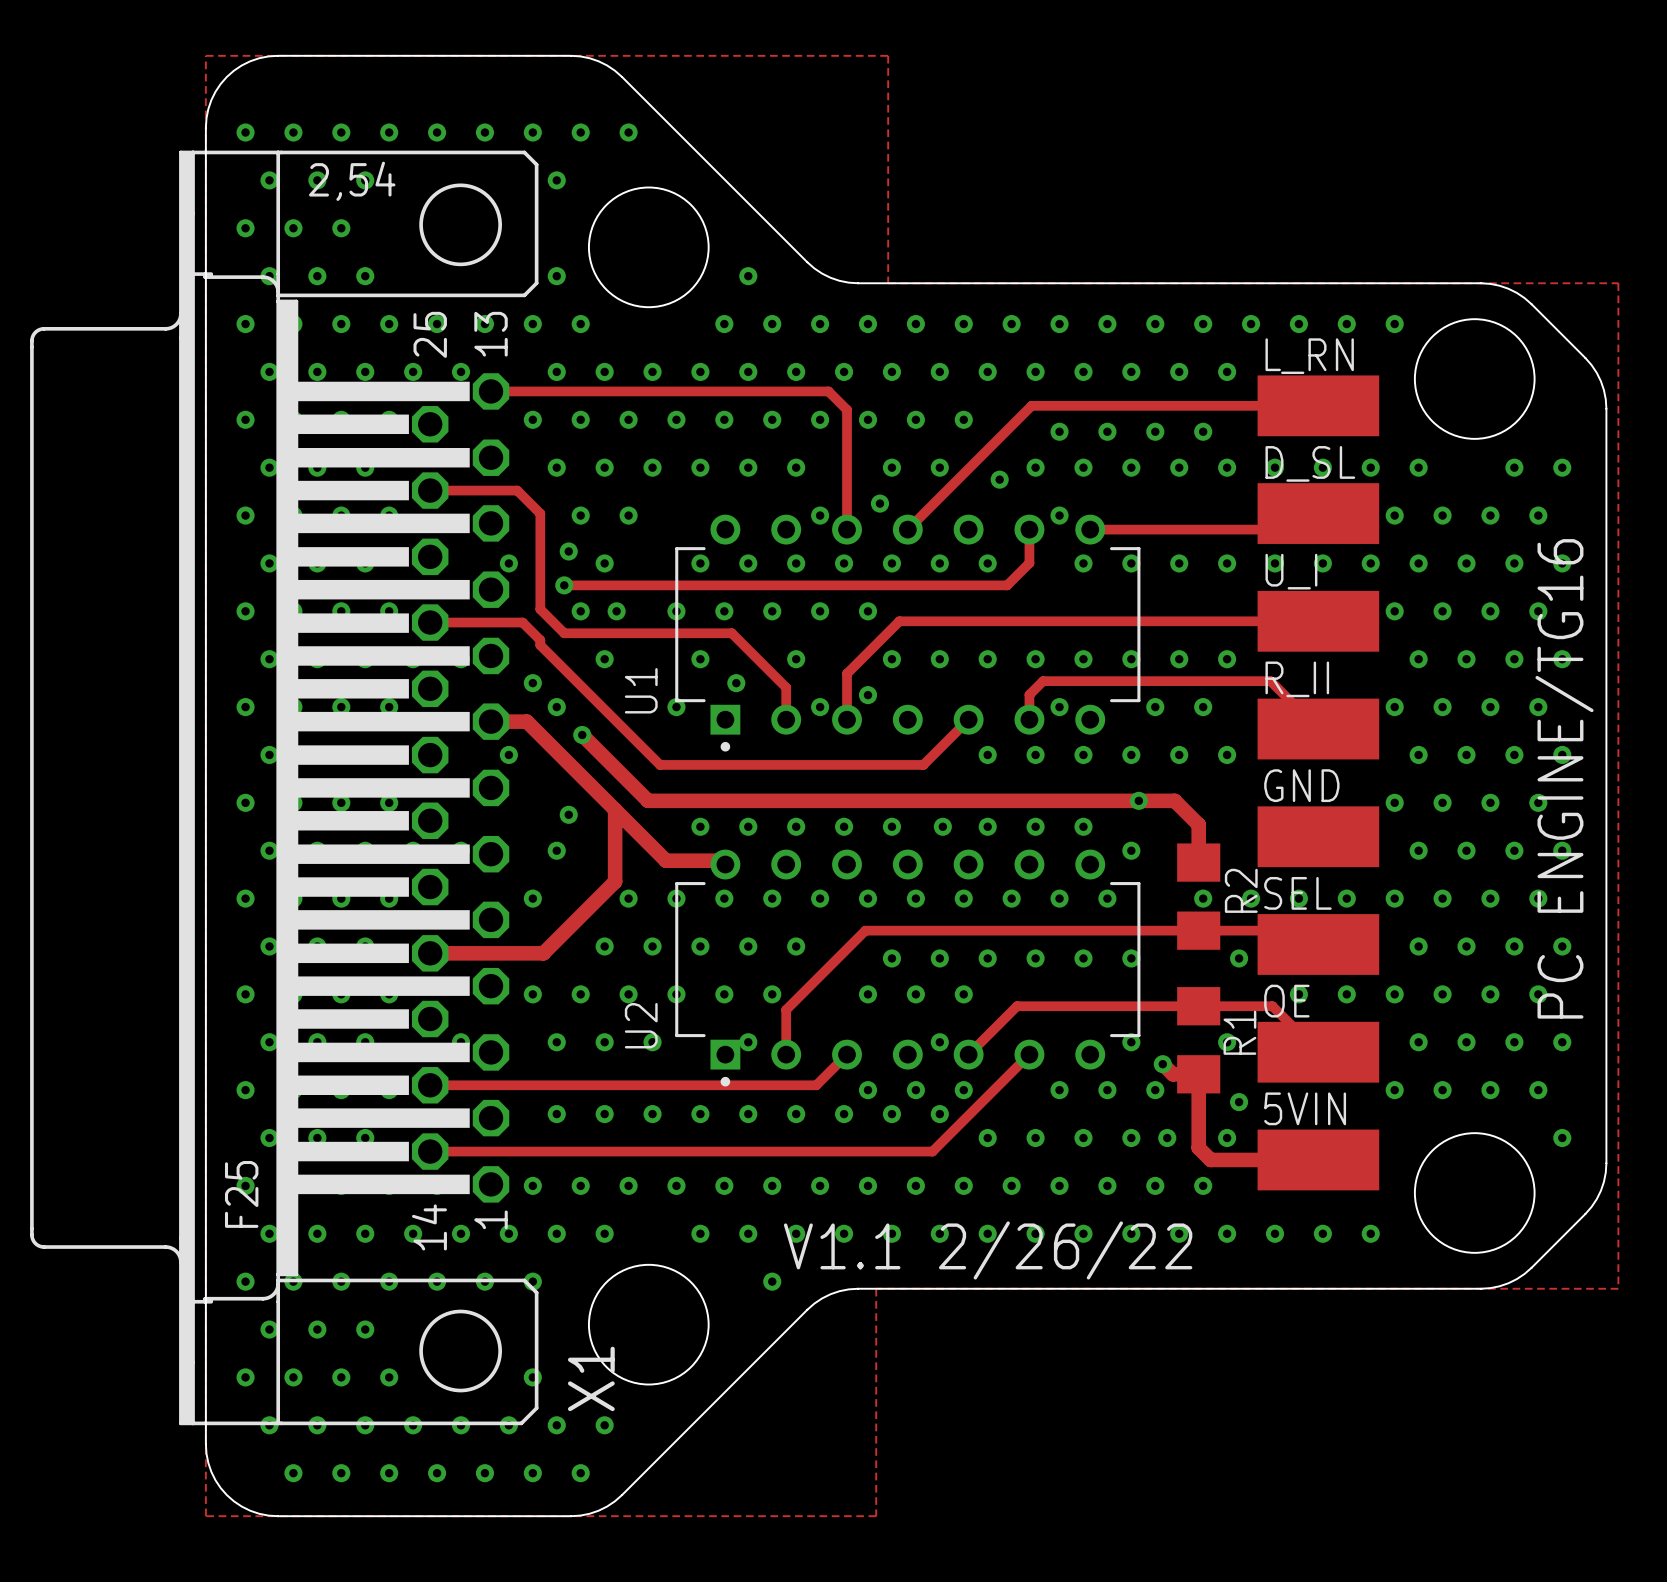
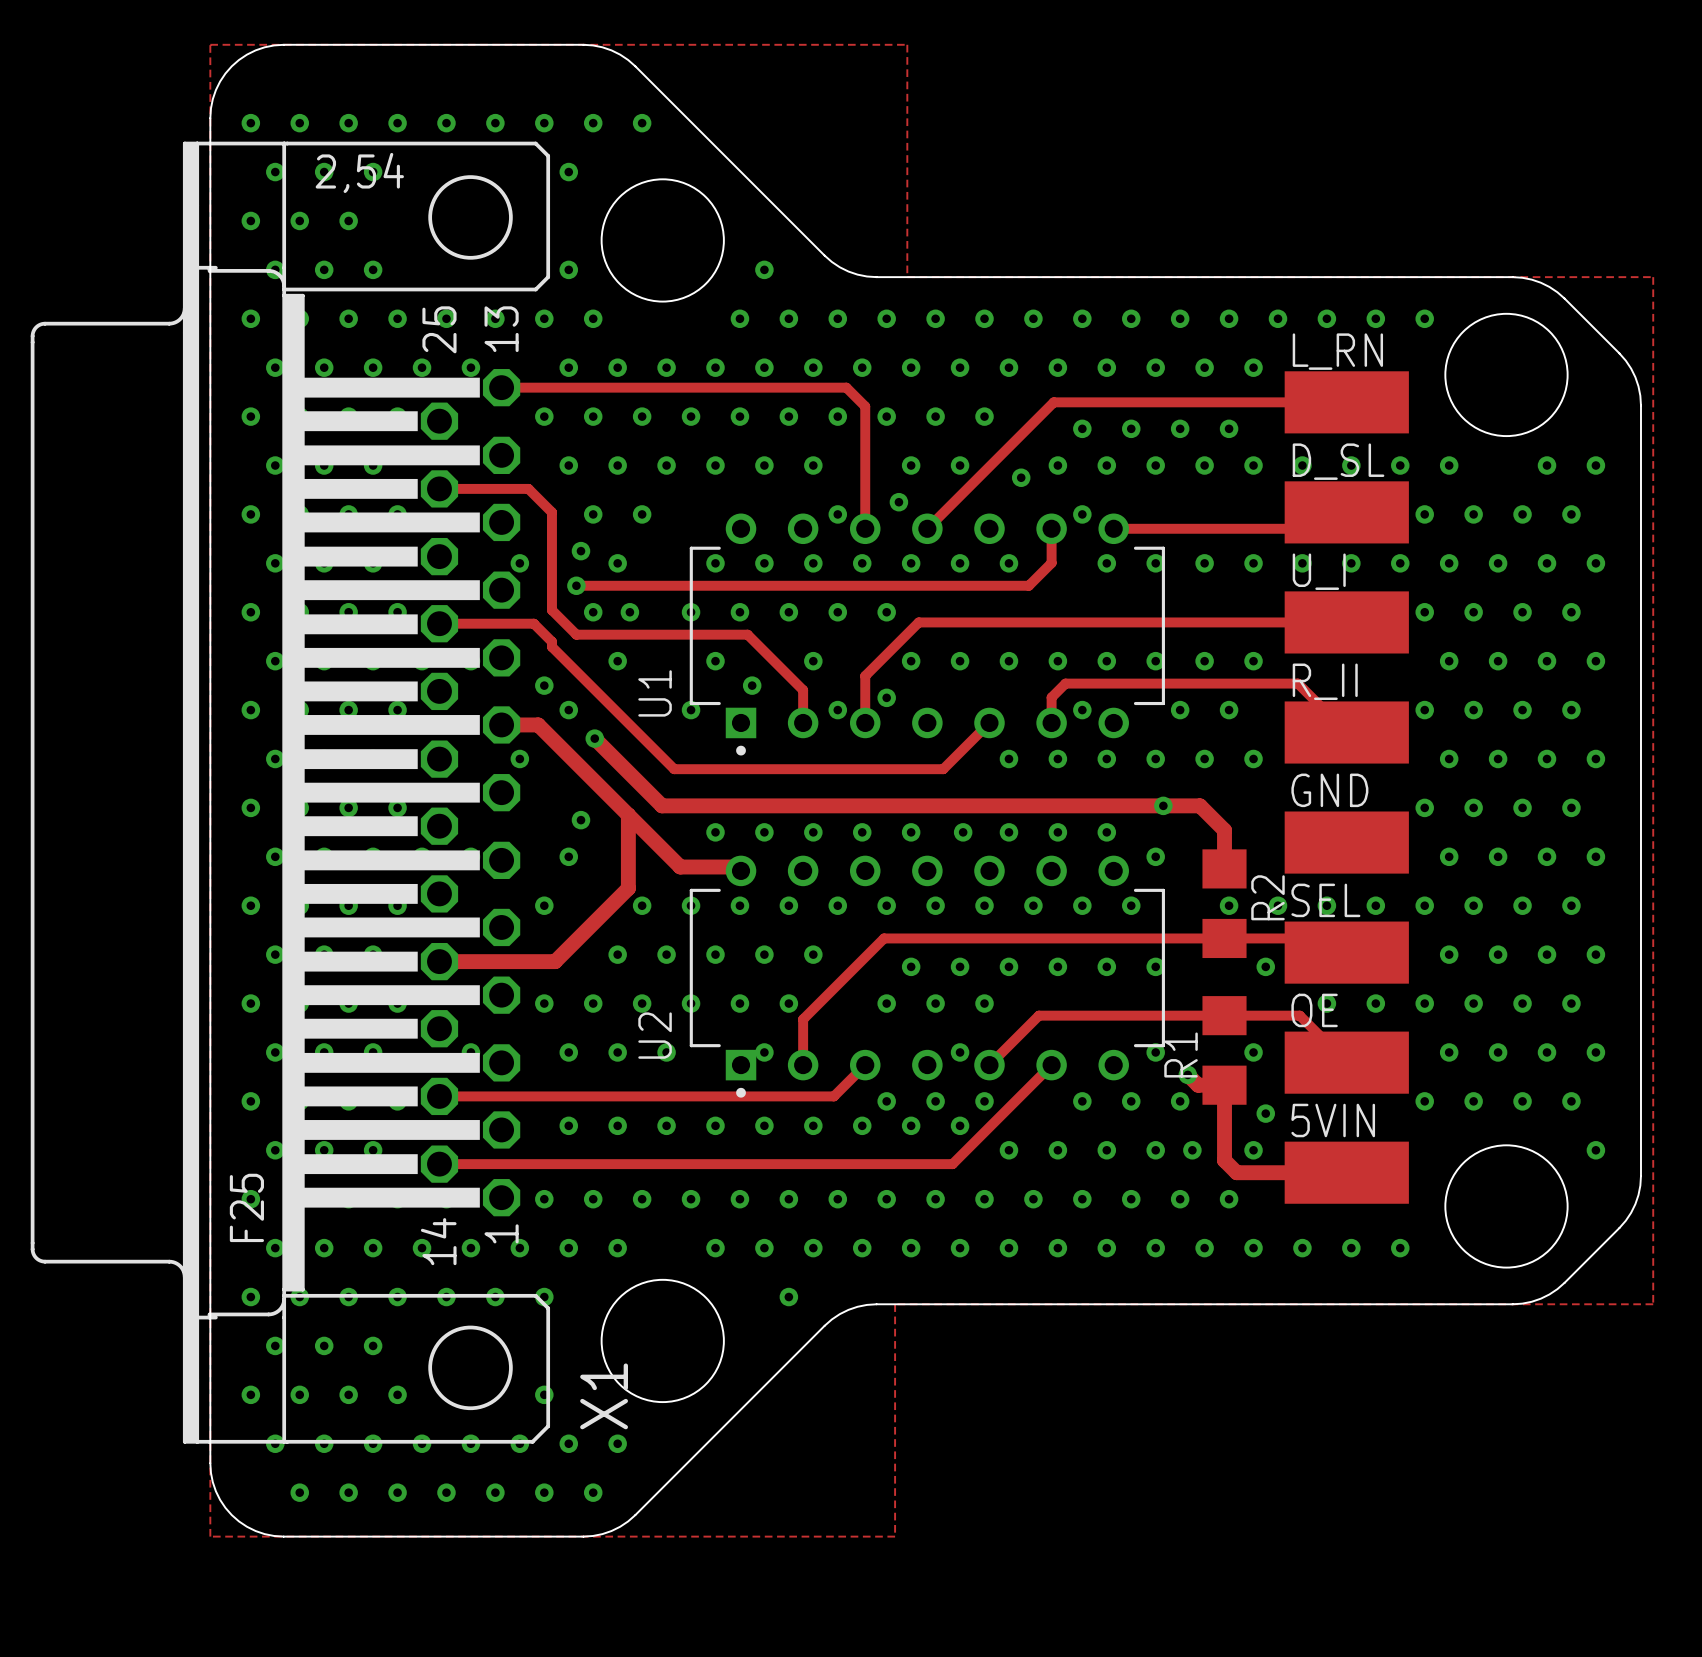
text: PC ENGINE/TG16 (1564, 778) -> none
R1 name position: R1 (1239, 1032) -> R1 (1181, 1055)
text: V1.1 2/26/22 (988, 1250) -> none

